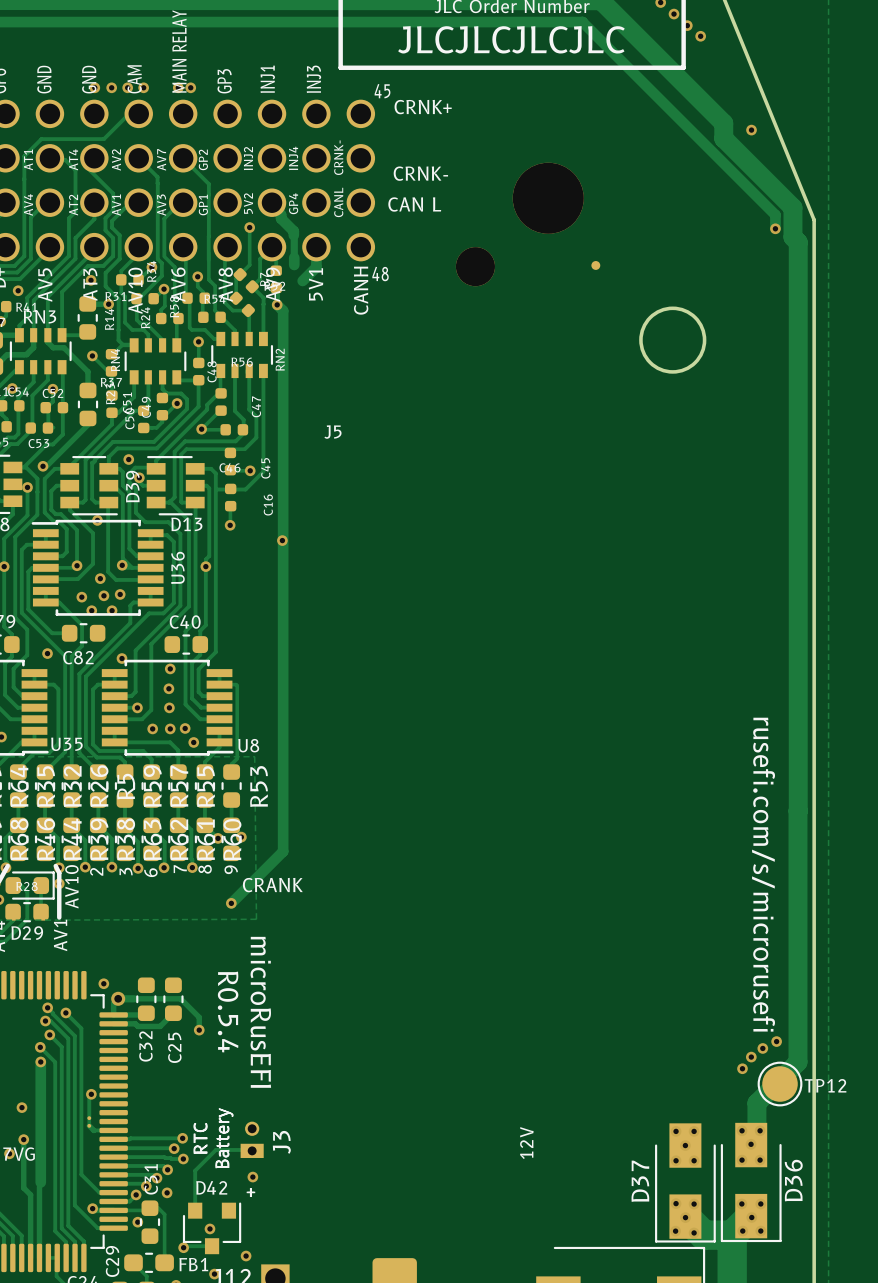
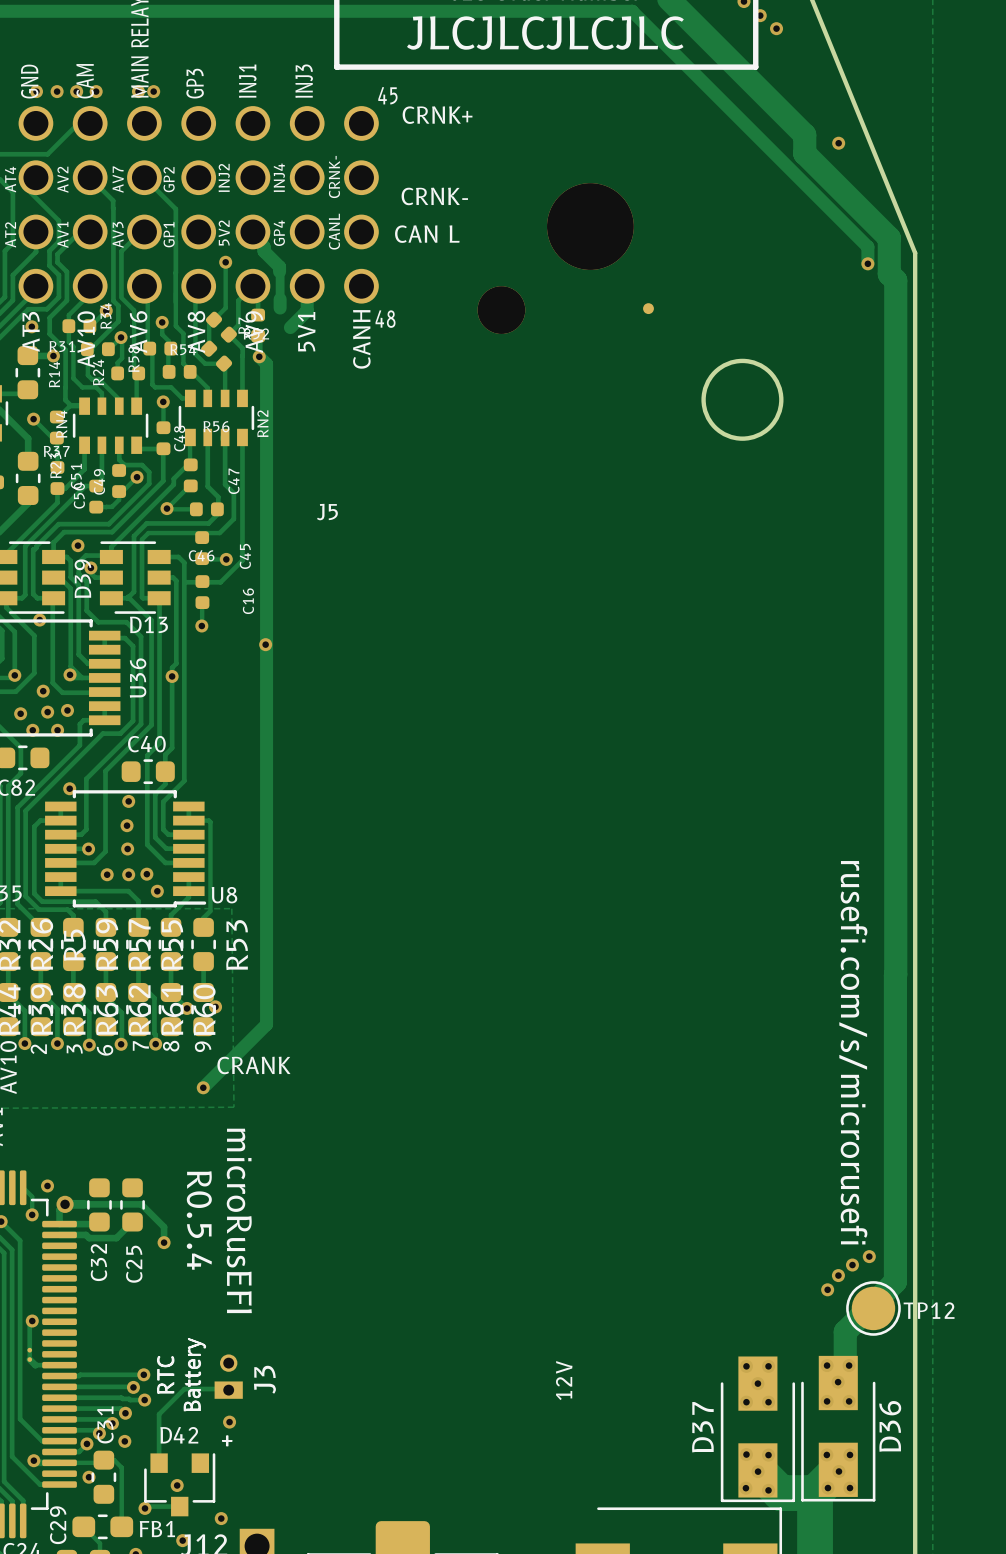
track: none -> (23, 1187) (32, 1196) (32, 1214)
via: none -> (32, 1214)

